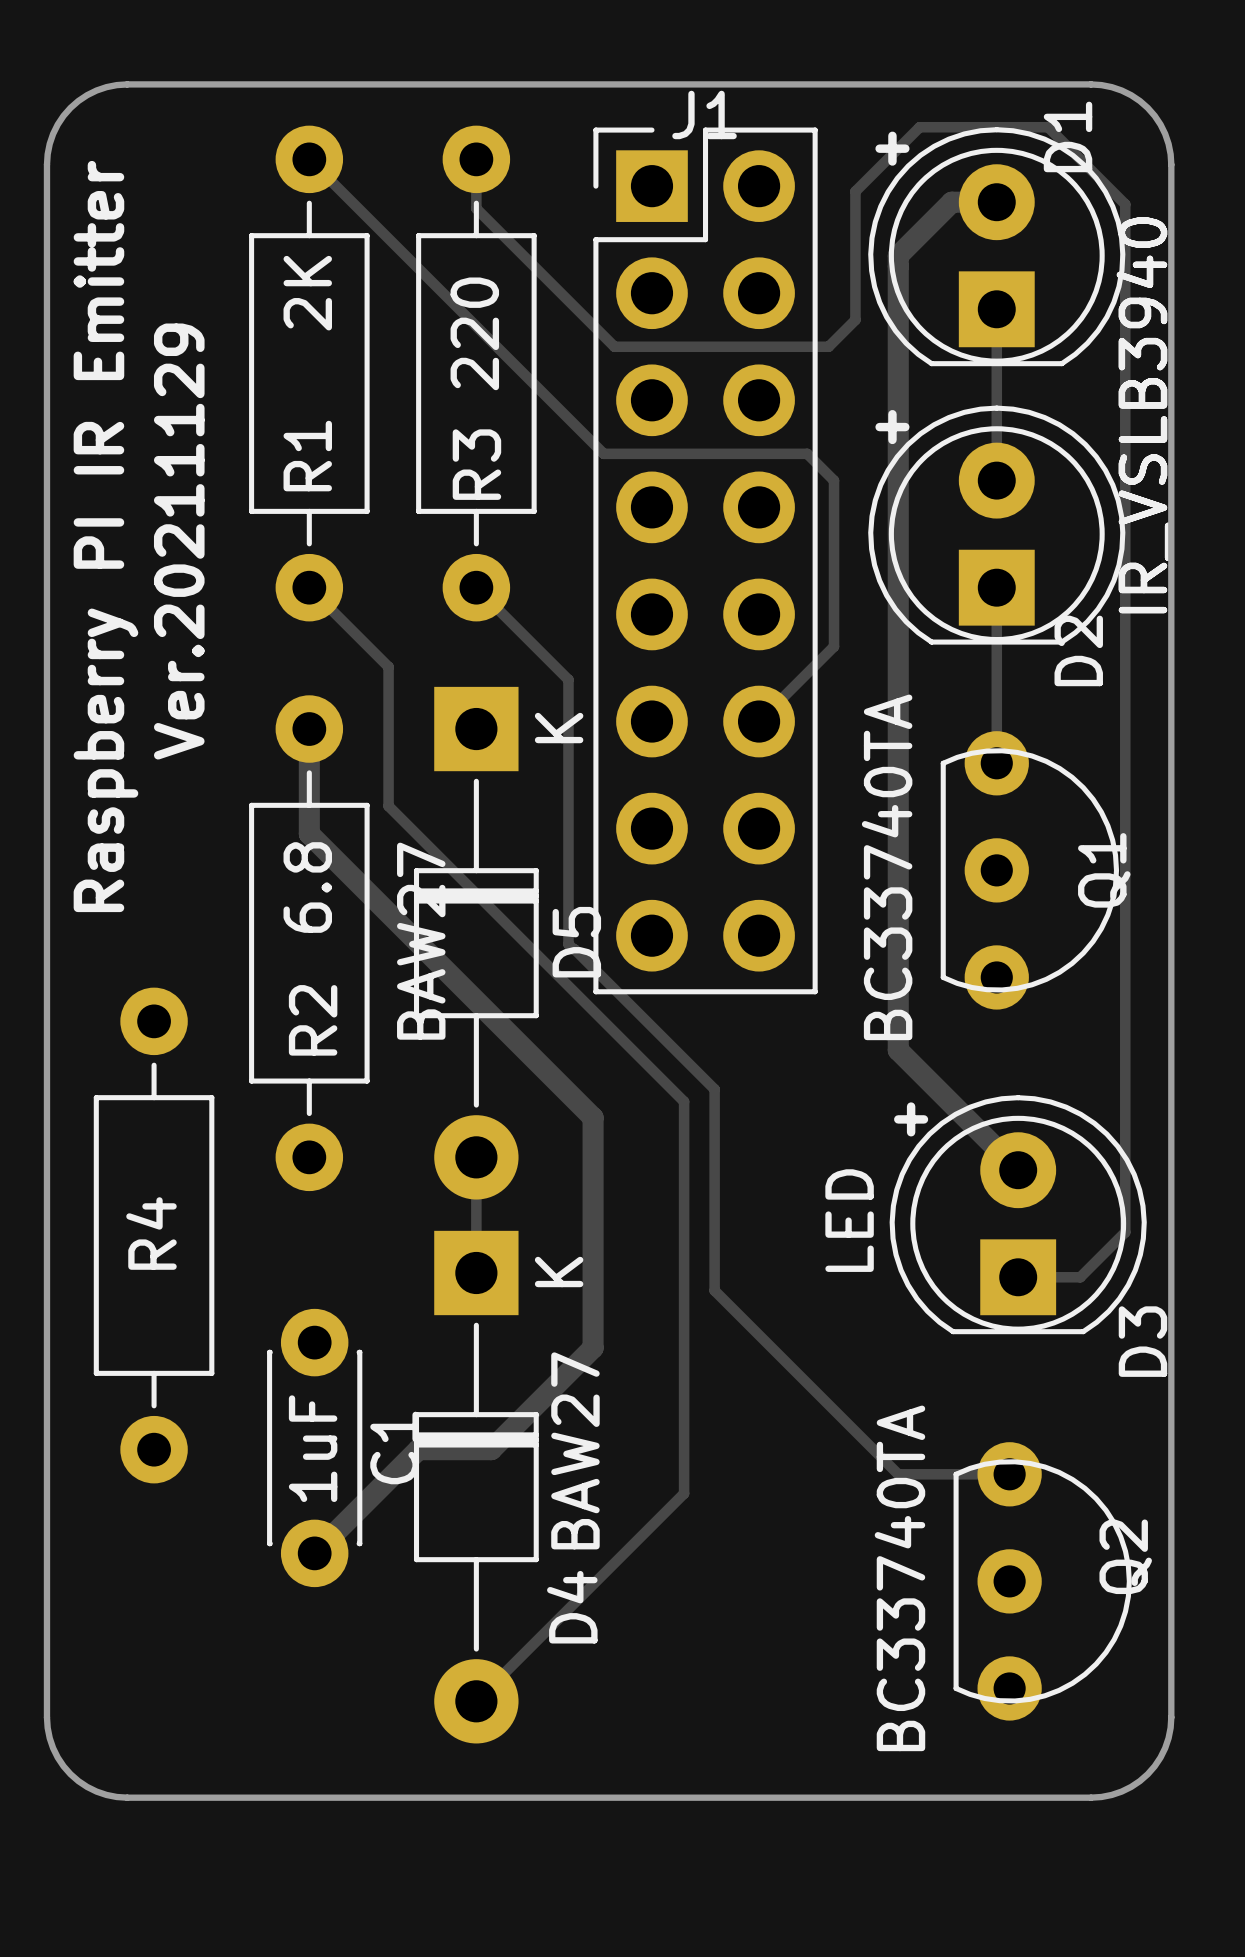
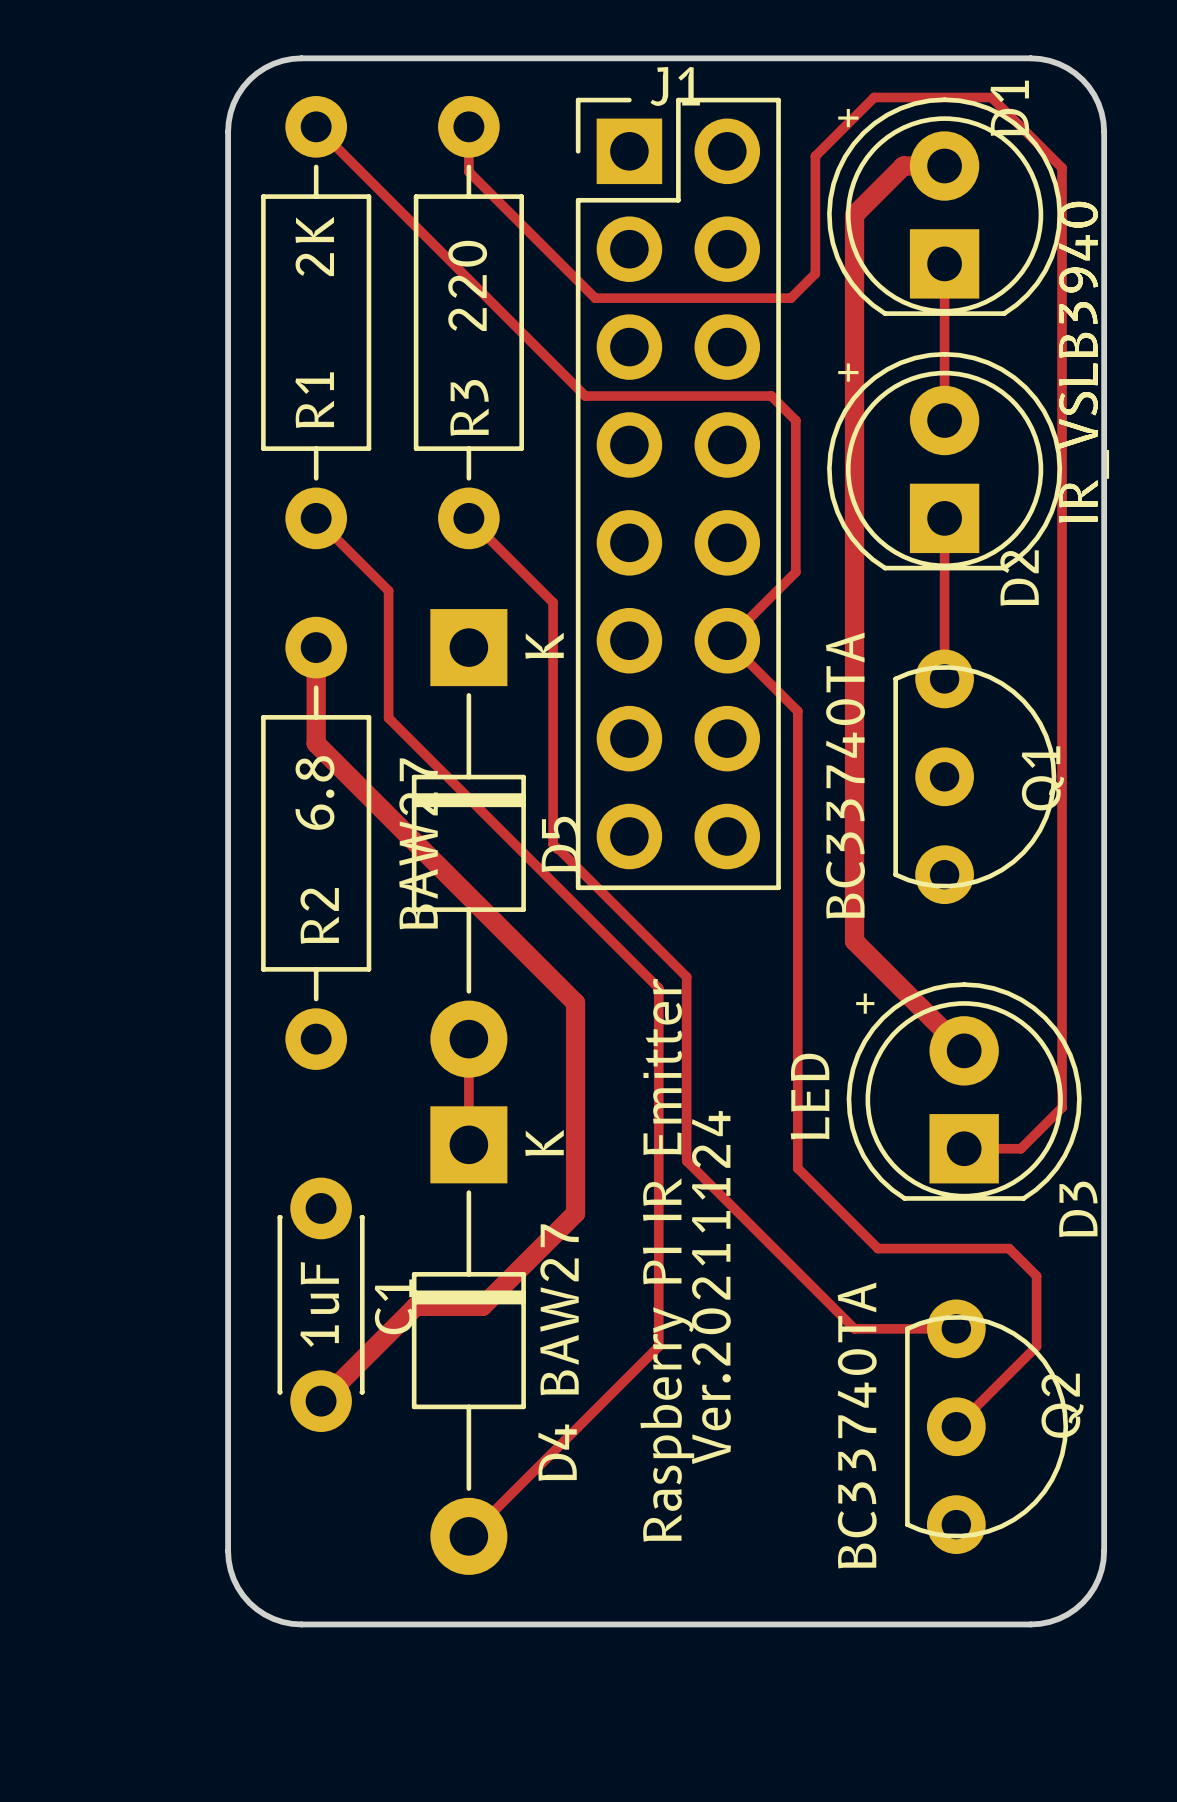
board edge: (293, 84) (127, 84) (106, 87) (87, 95) (63, 115) (53, 133) (46, 164) (47, 1727) (53, 1748) (70, 1774) (87, 1786) (106, 1794) (127, 1797) (293, 1797) -> (301, 58) (273, 63) (249, 79) (233, 103) (228, 131) (228, 1551) (233, 1579) (249, 1602) (273, 1618) (301, 1624)
text position: Raspberry PI IR Emitter (105, 536) -> Raspberry PI IR Emitter (667, 1260)
text: Ver.20211129 (179, 541) -> none
track: none -> (727, 640) (797, 711) (797, 1168) (878, 1248) (1009, 1248) (1036, 1276) (1036, 1346) (956, 1426)
R4: (154, 1235) -> none
text: none -> Ver.20211124 (711, 1287)

